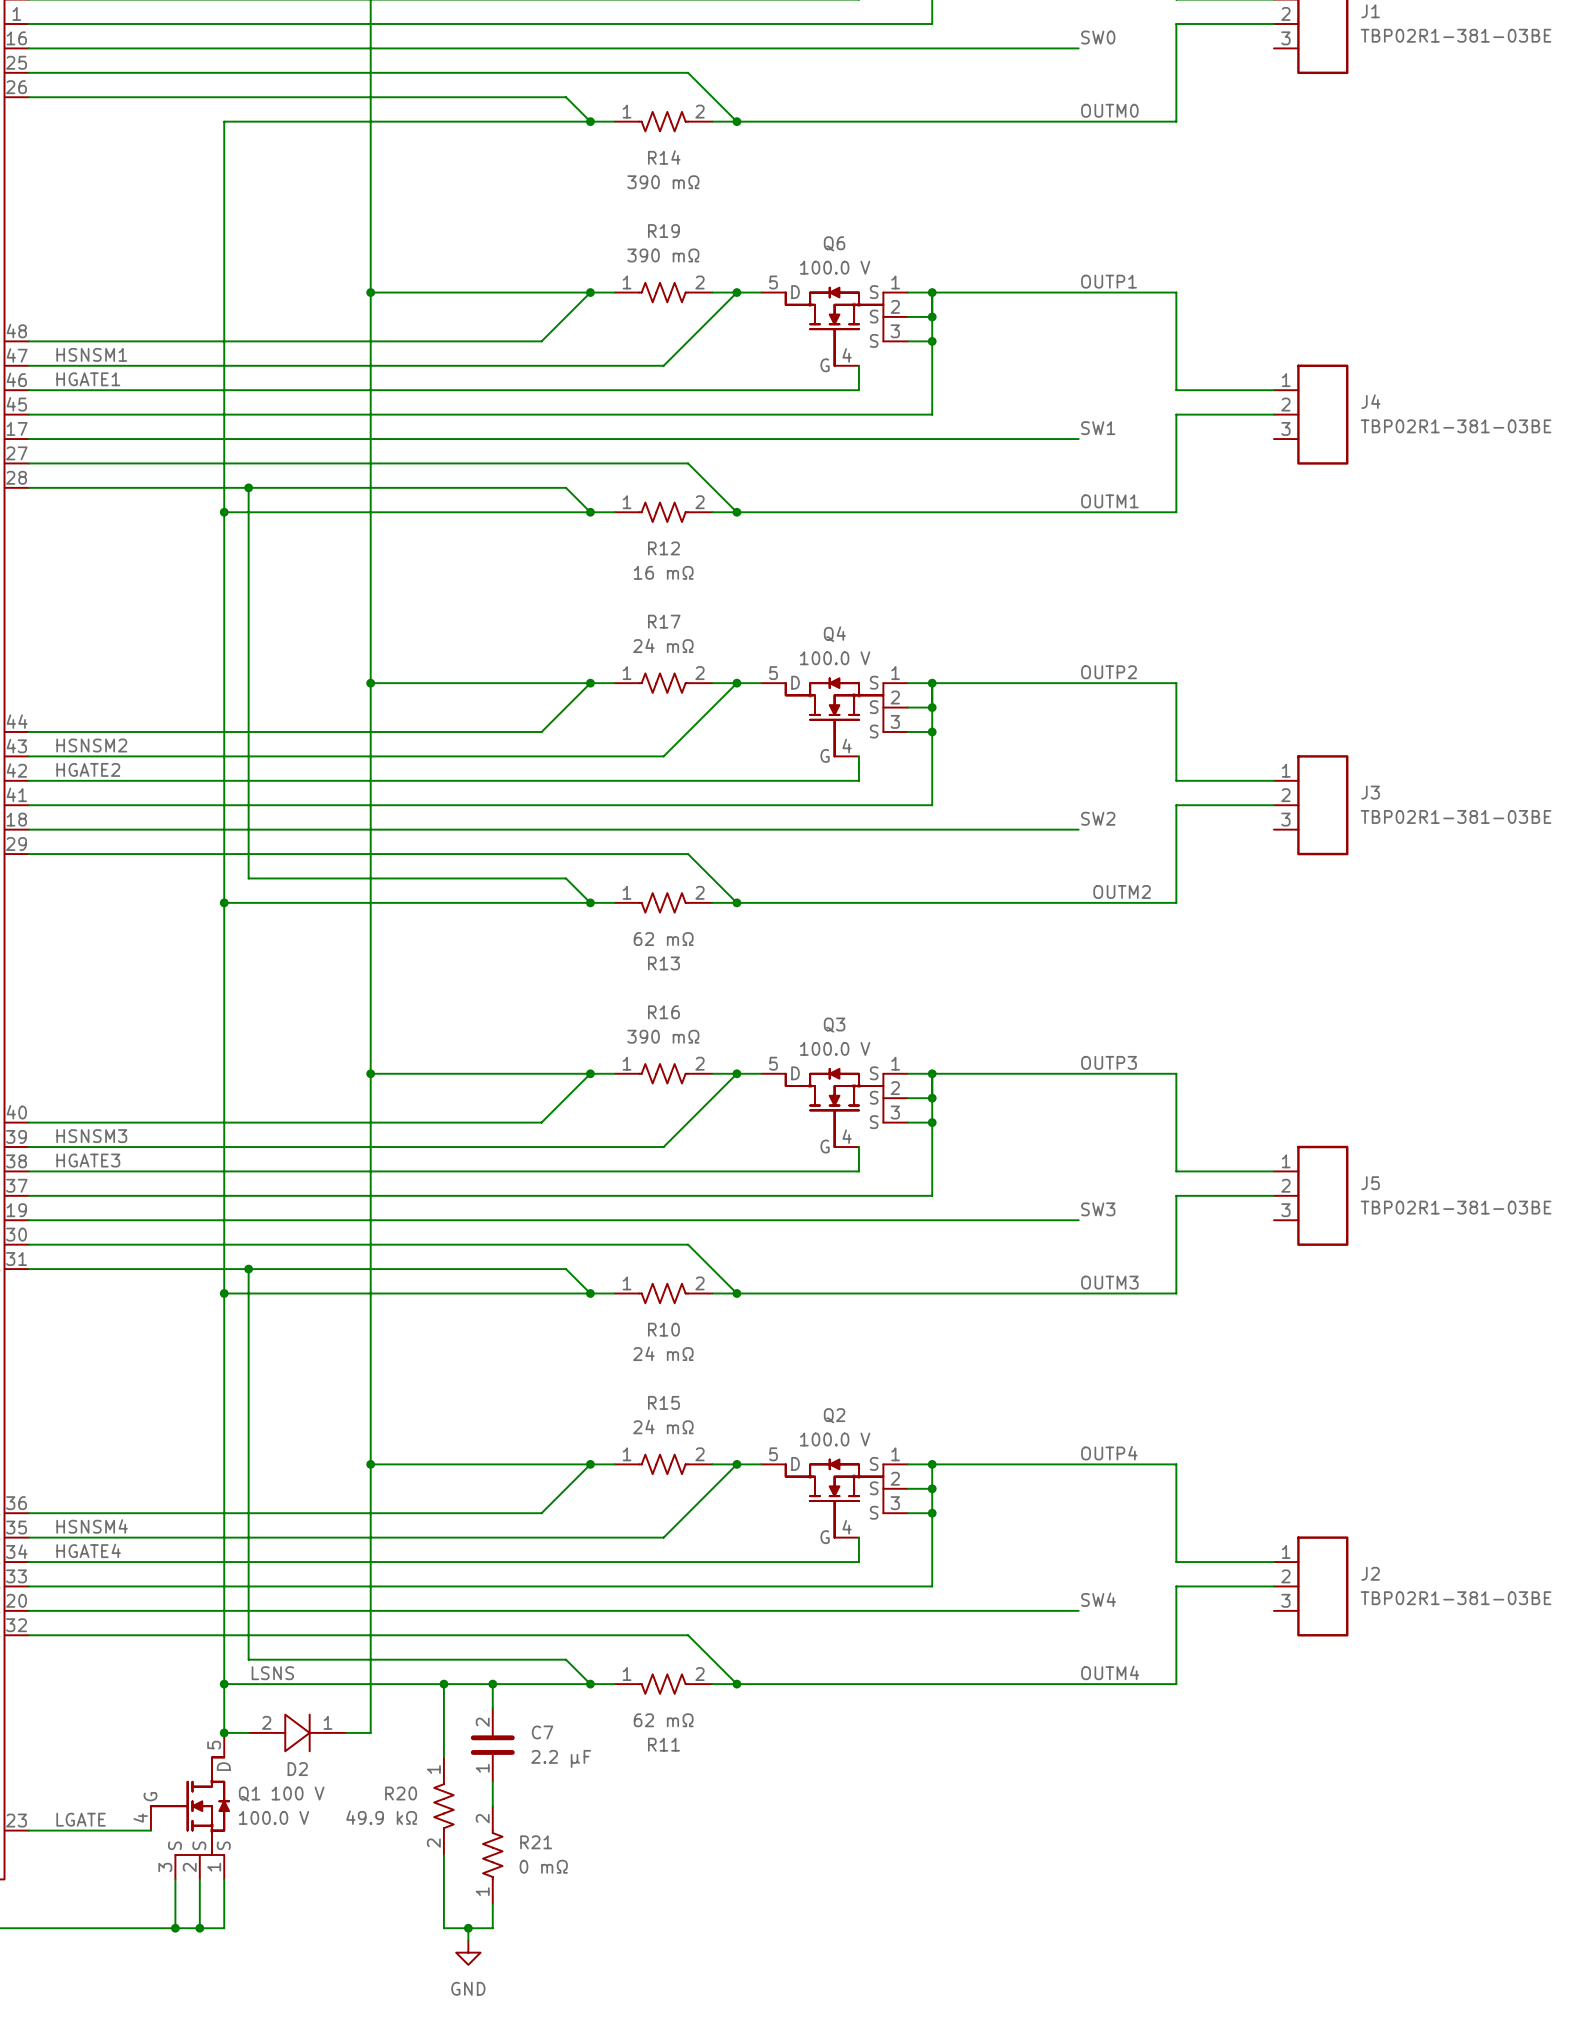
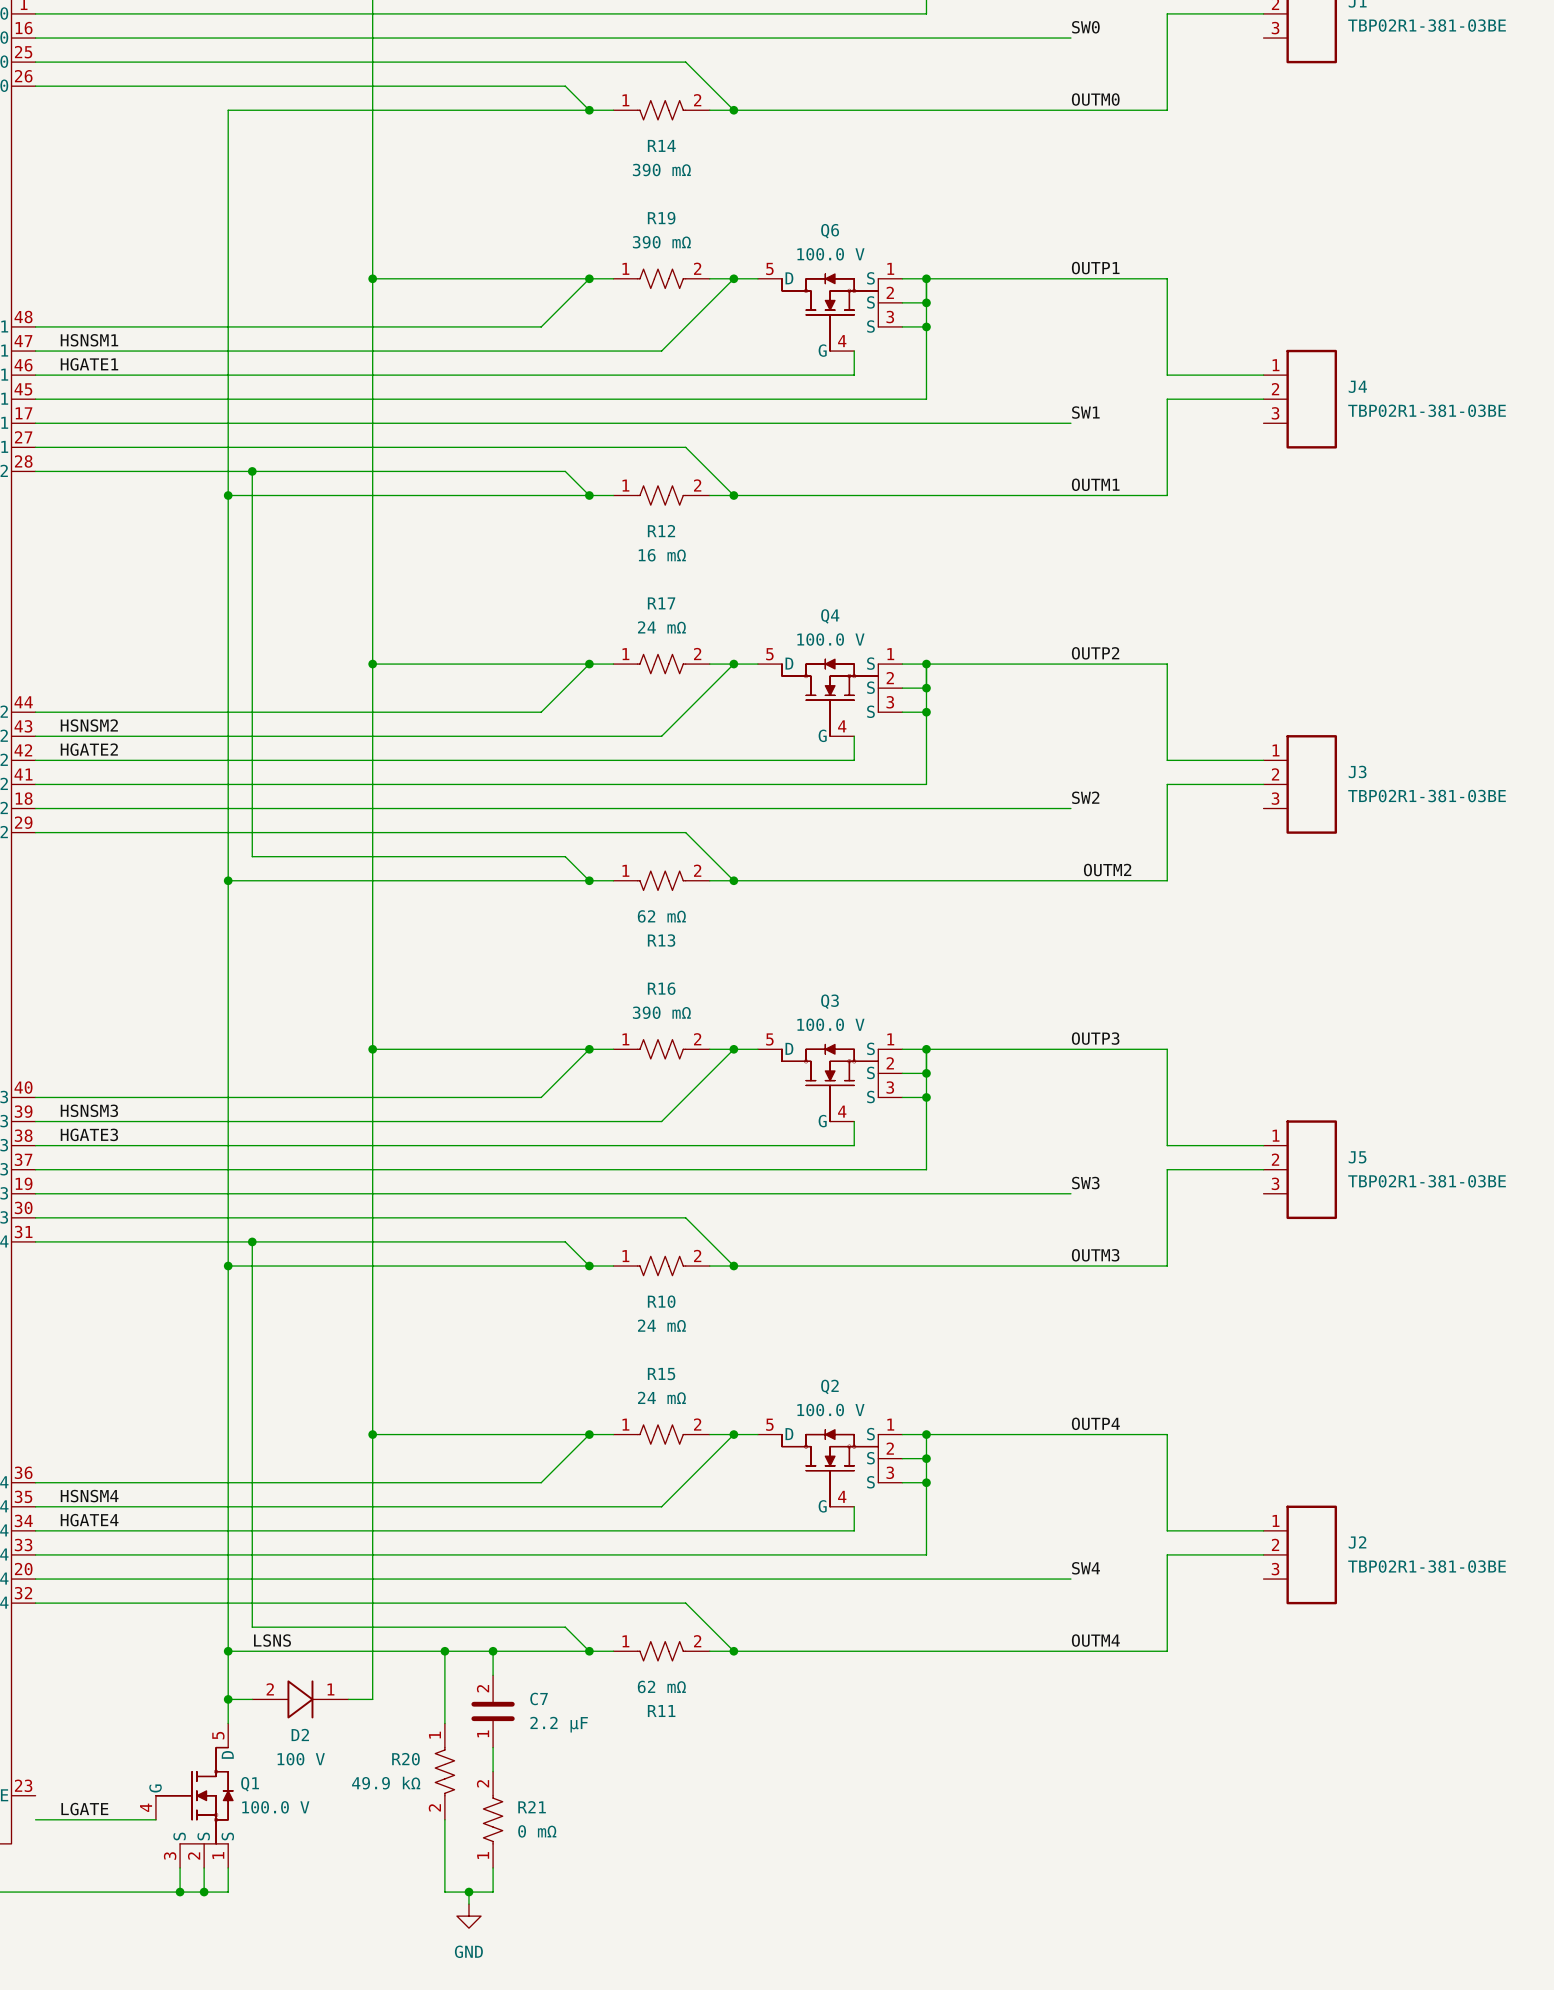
Q1 position: (190, 1806) -> (194, 1795)
label position: LGATE (81, 1819) -> LGATE (84, 1809)
wire: (28, 1830) (150, 1830) -> (35, 1819) (155, 1819)

